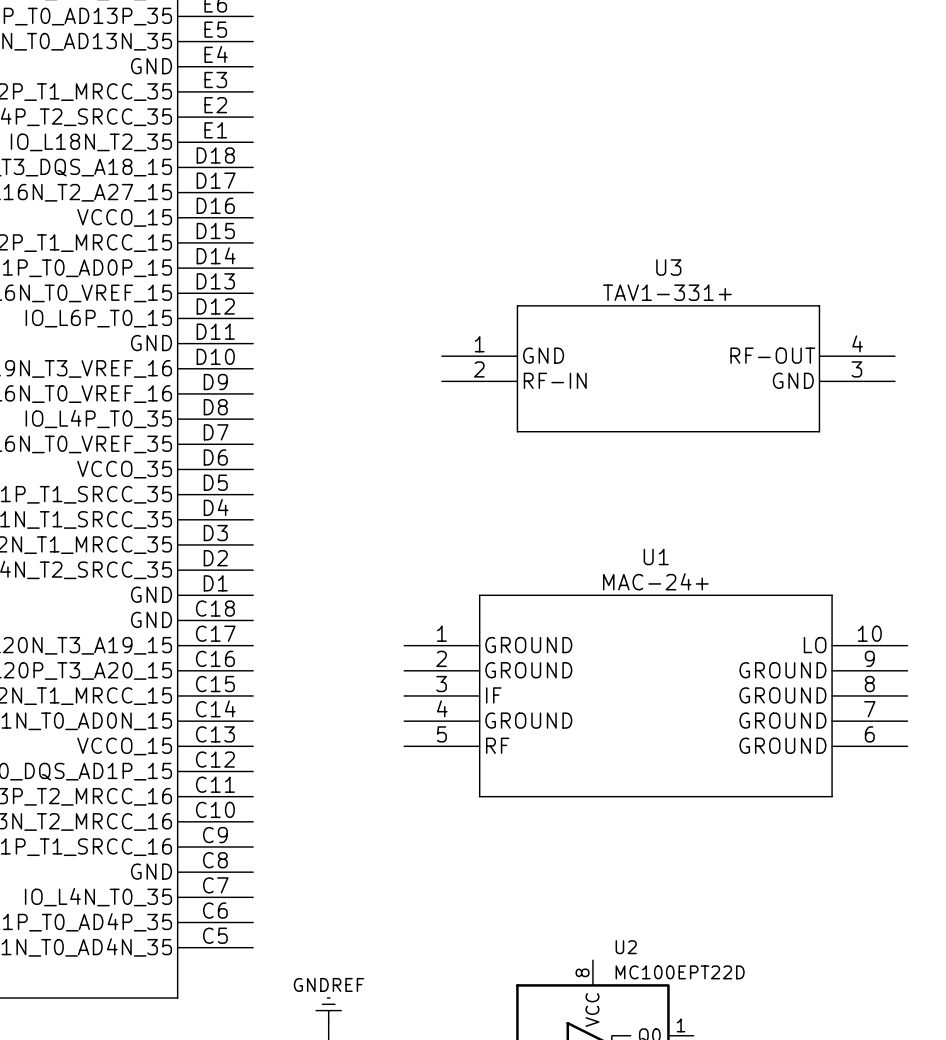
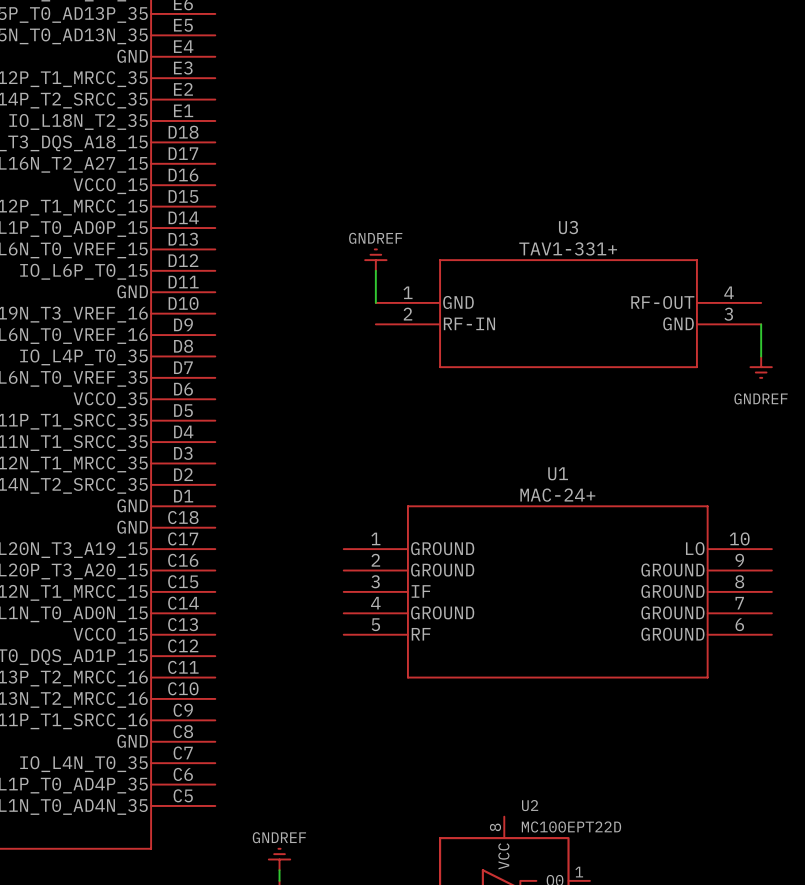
power symbol: none -> GNDREF (375, 260)
wire: none -> (375, 270) (375, 302)
wire: none -> (761, 324) (761, 356)
power symbol: none -> GNDREF (761, 367)

